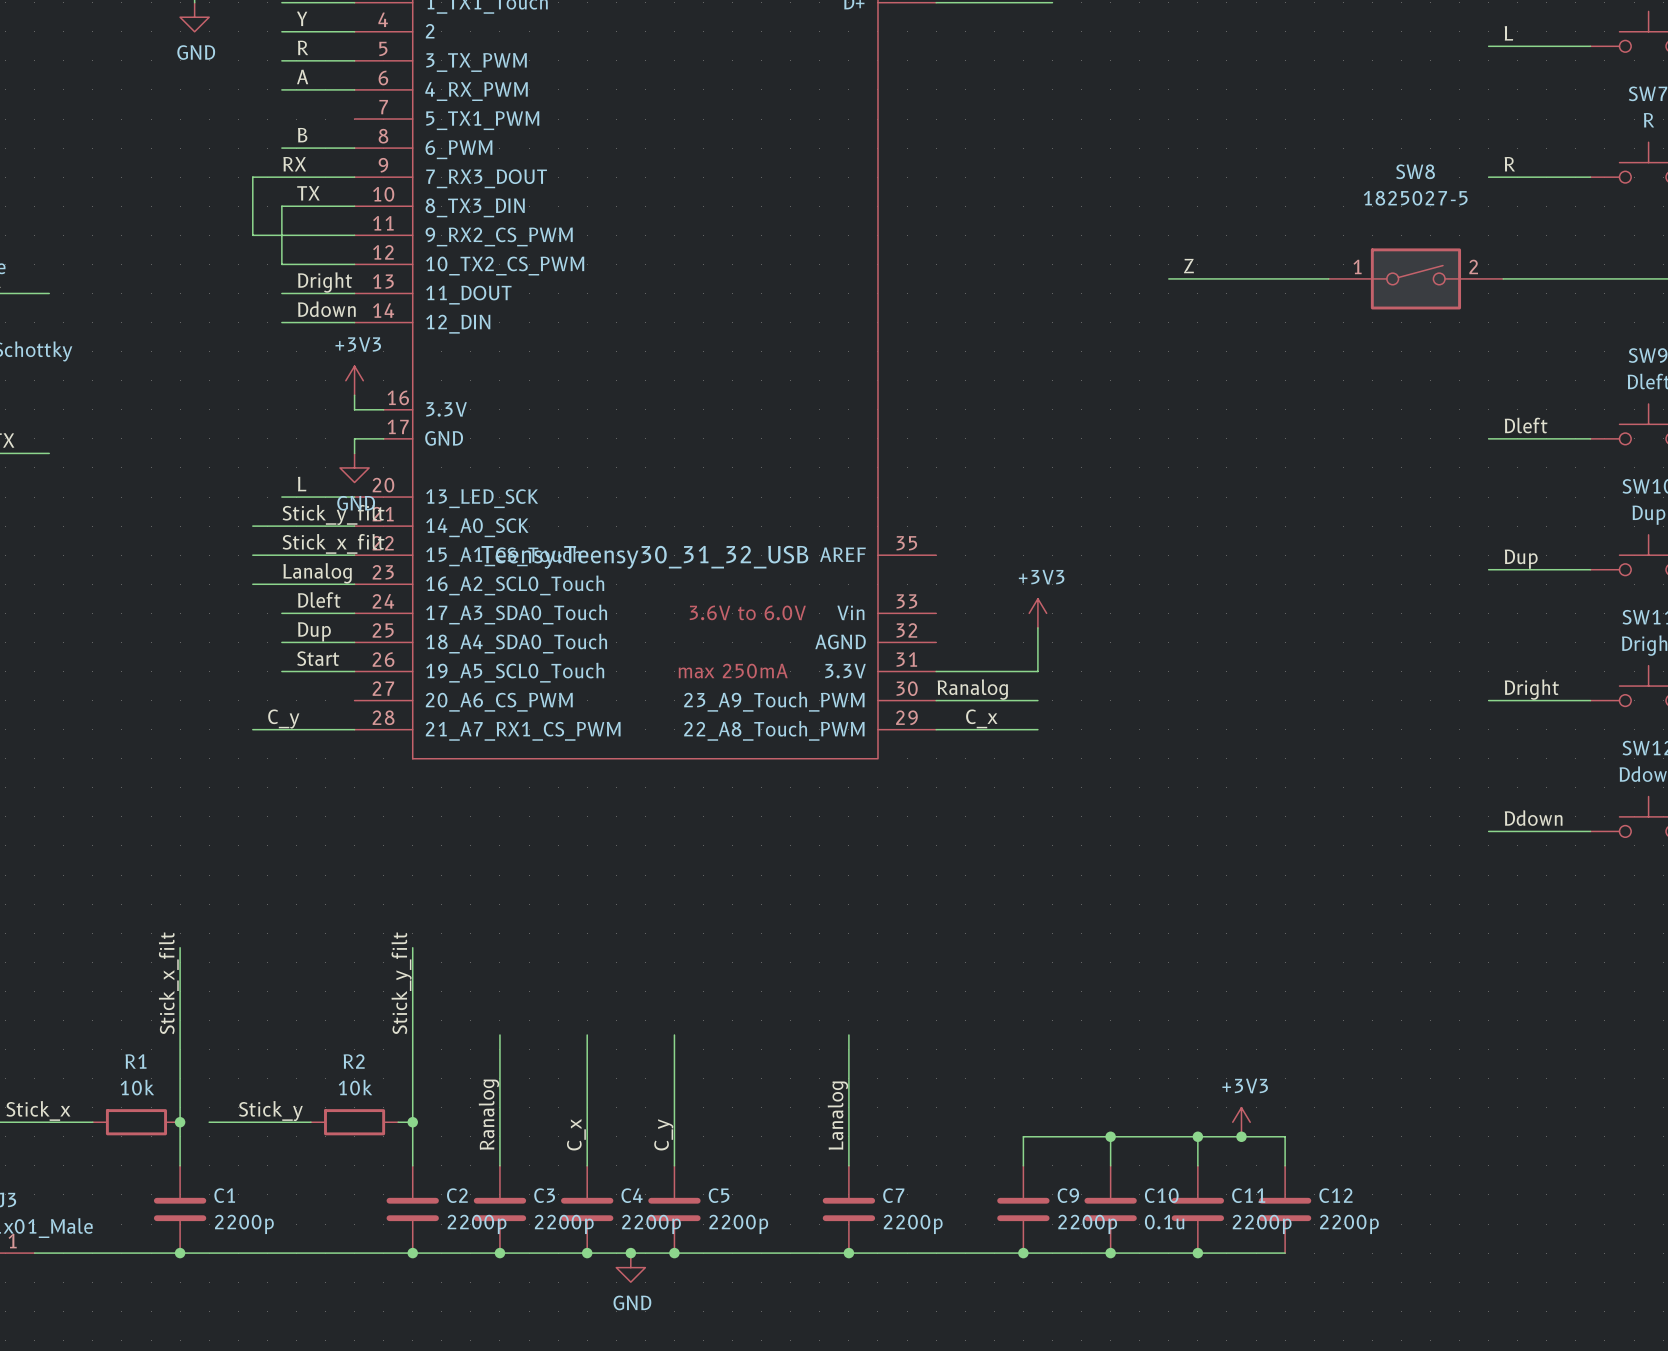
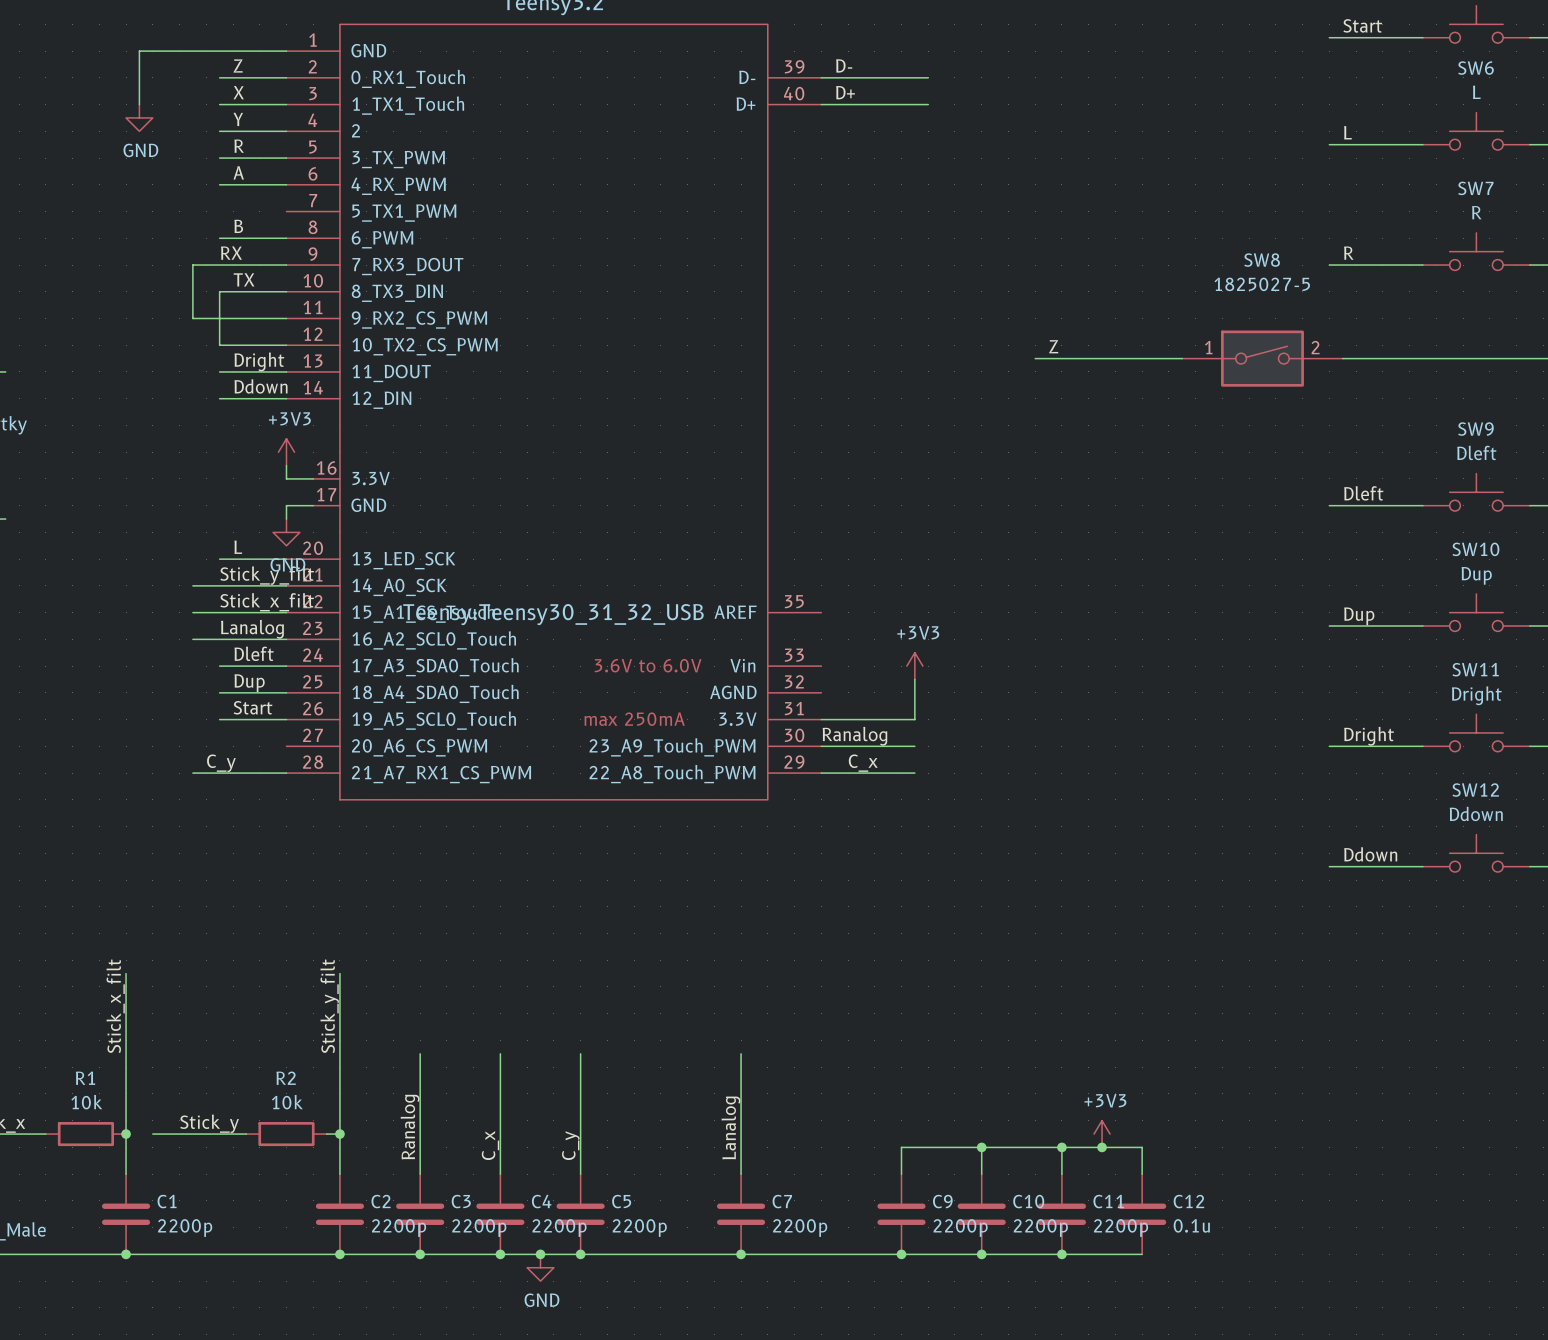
C10 value: 0.1u (1164, 1222) -> 2200p (1040, 1228)
C12 value: 2200p (1349, 1224) -> 0.1u (1191, 1225)

